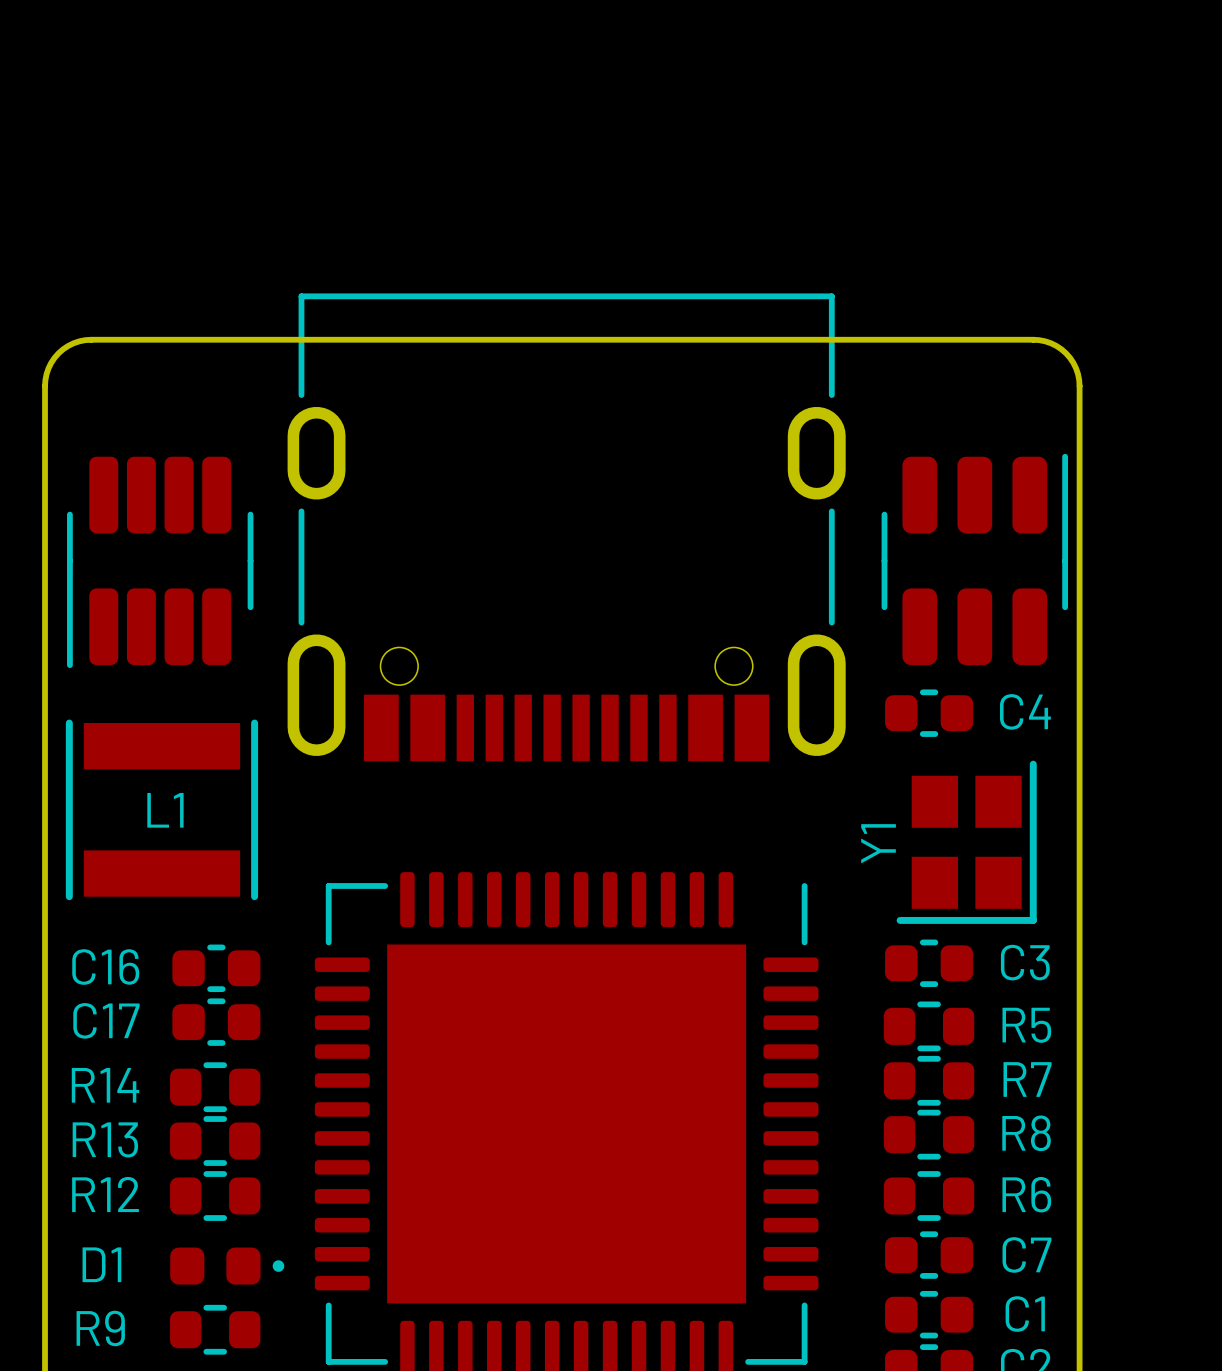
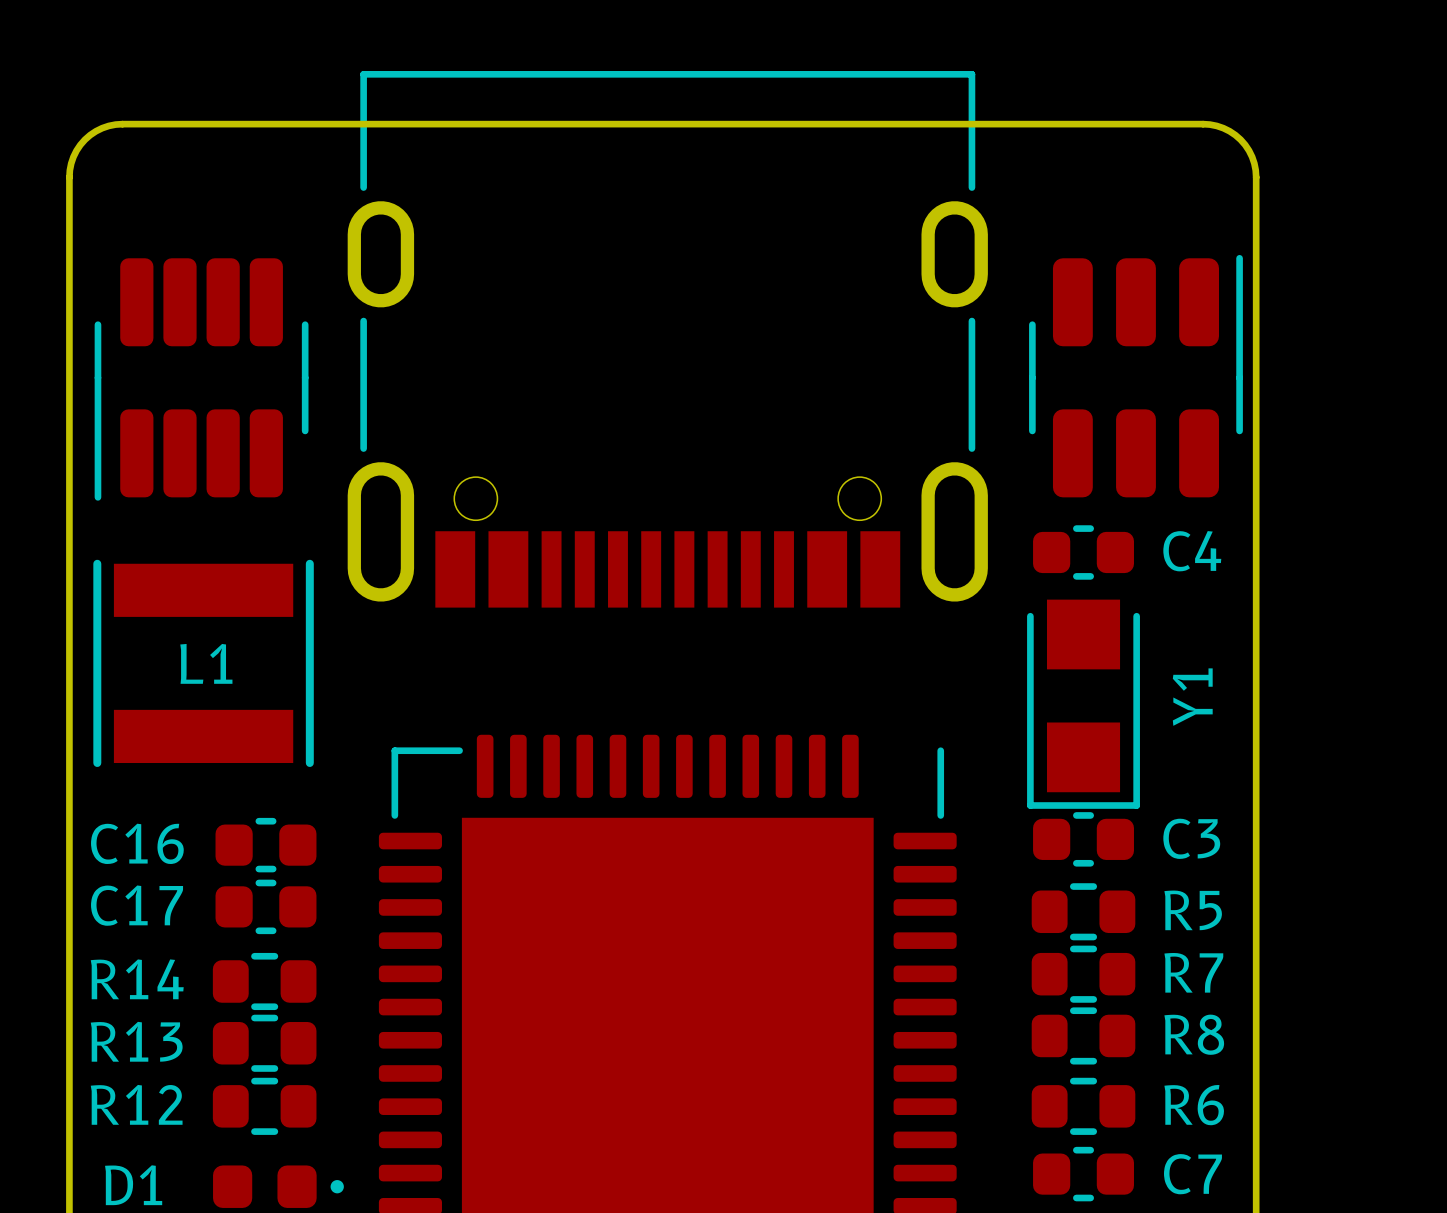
Y1 footprint: [896, 760, 1037, 924] -> [1027, 599, 1140, 809]
Y1 name position: Y1 (878, 843) -> Y1 (1192, 697)

